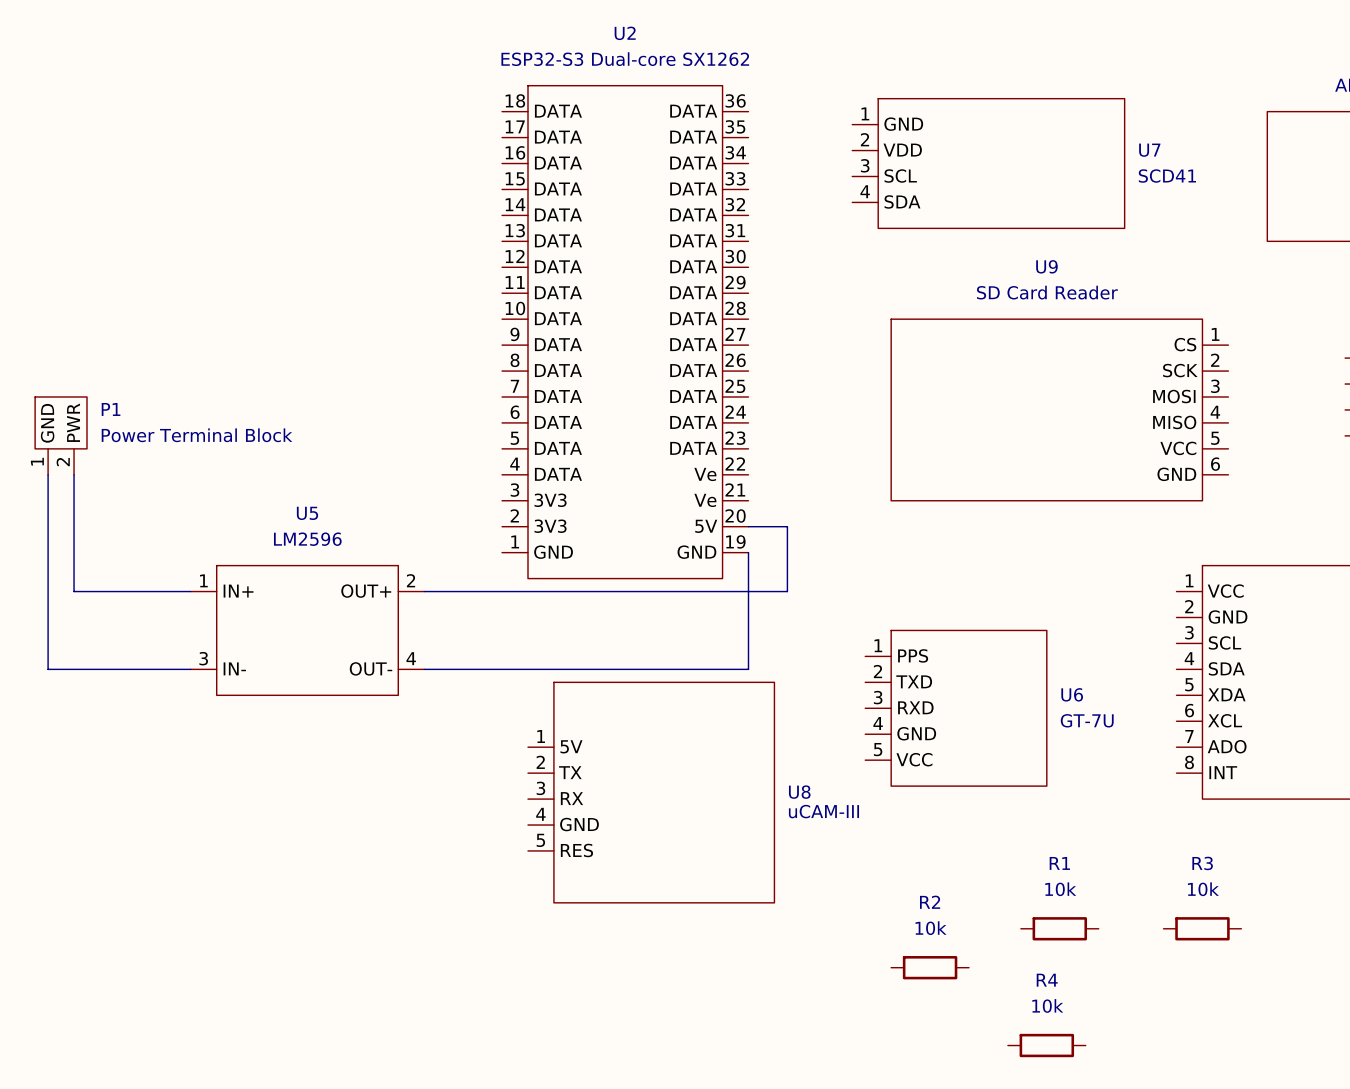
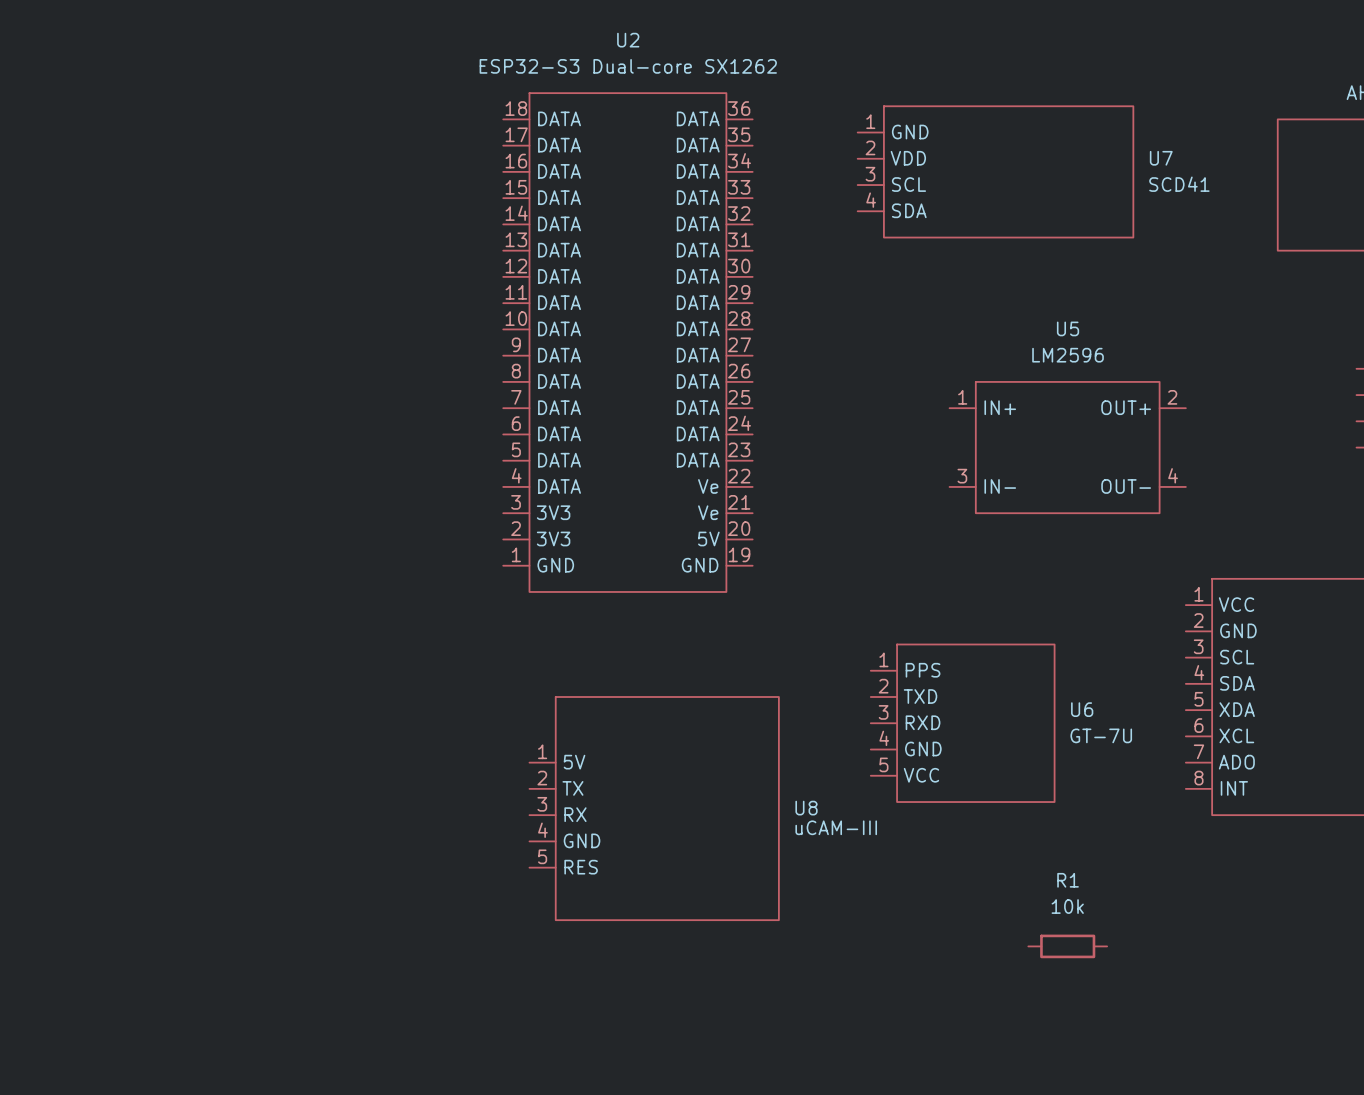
U9: SD Card Reader (1059, 409) -> none
P1: Power Terminal Block (61, 435) -> none
wire: (48, 474) (48, 669) (190, 669) -> none
wire: (74, 474) (74, 591) (190, 591) -> none
wire: (748, 526) (787, 526) (787, 591) (424, 591) -> none
wire: (748, 552) (748, 669) (424, 669) -> none
U5 position: (307, 630) -> (1067, 447)
R3: 10k (1202, 928) -> none
R2: 10k (930, 967) -> none
R4: 10k (1046, 1045) -> none

